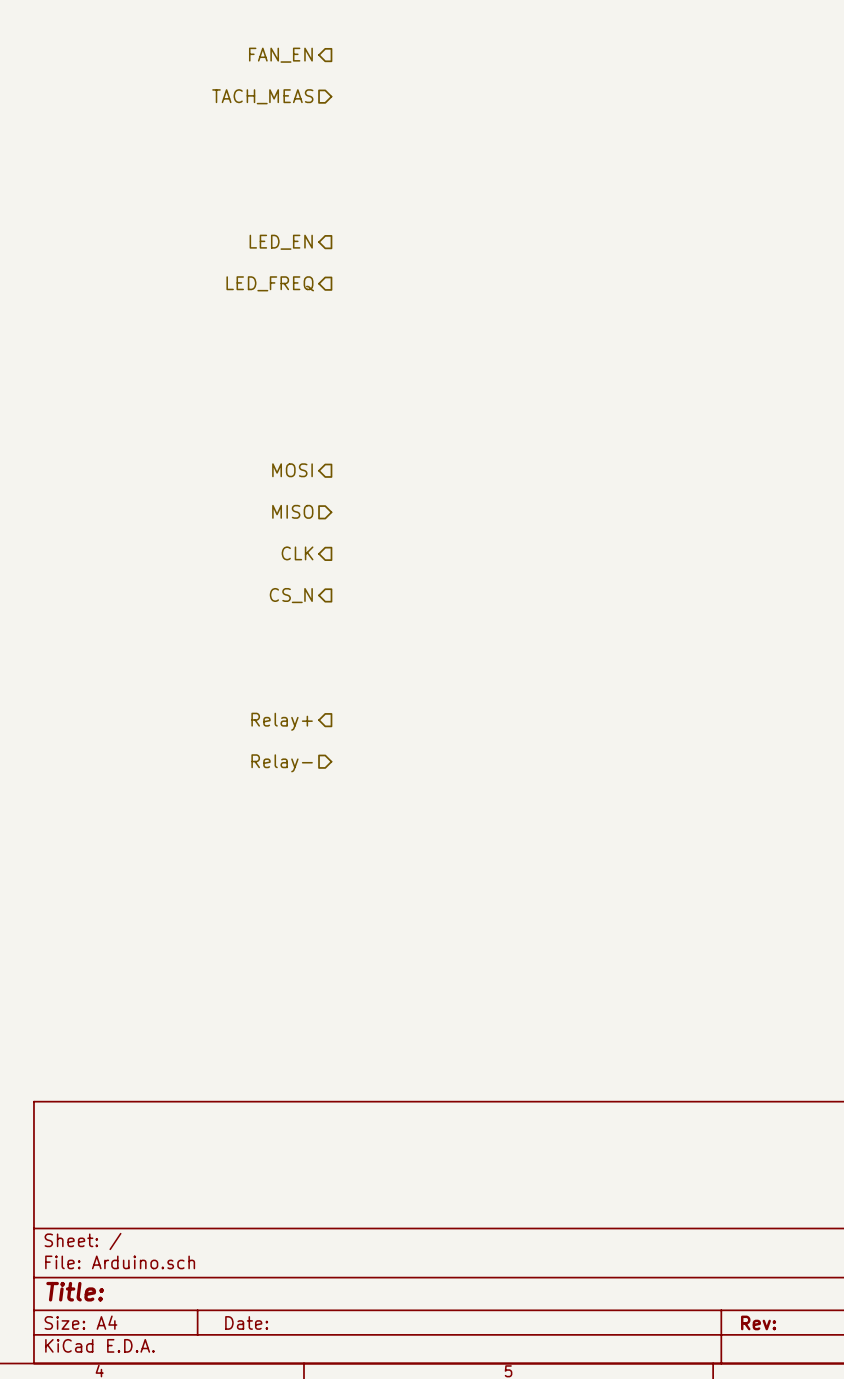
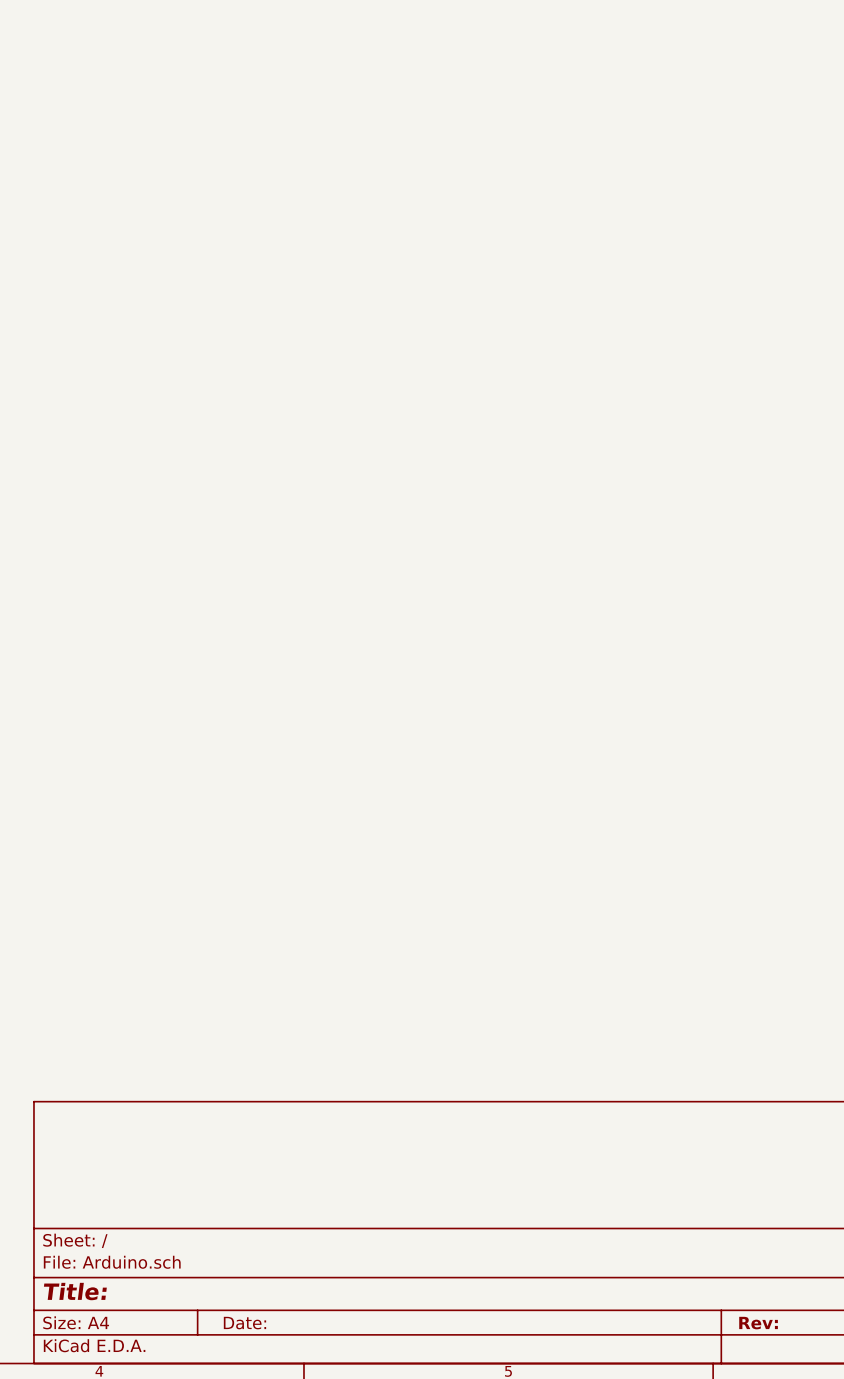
hierarchical label: FAN_EN (280, 55) -> none
hierarchical label: TACH_MEAS (262, 96) -> none
hierarchical label: LED_EN (281, 242) -> none
hierarchical label: LED_FREQ (270, 283) -> none
hierarchical label: MOSI (292, 470) -> none
hierarchical label: MISO (292, 511) -> none
hierarchical label: CLK (297, 553) -> none
hierarchical label: CS_N (291, 595) -> none
hierarchical label: Relay+ (282, 721) -> none
hierarchical label: Relay- (282, 763) -> none

